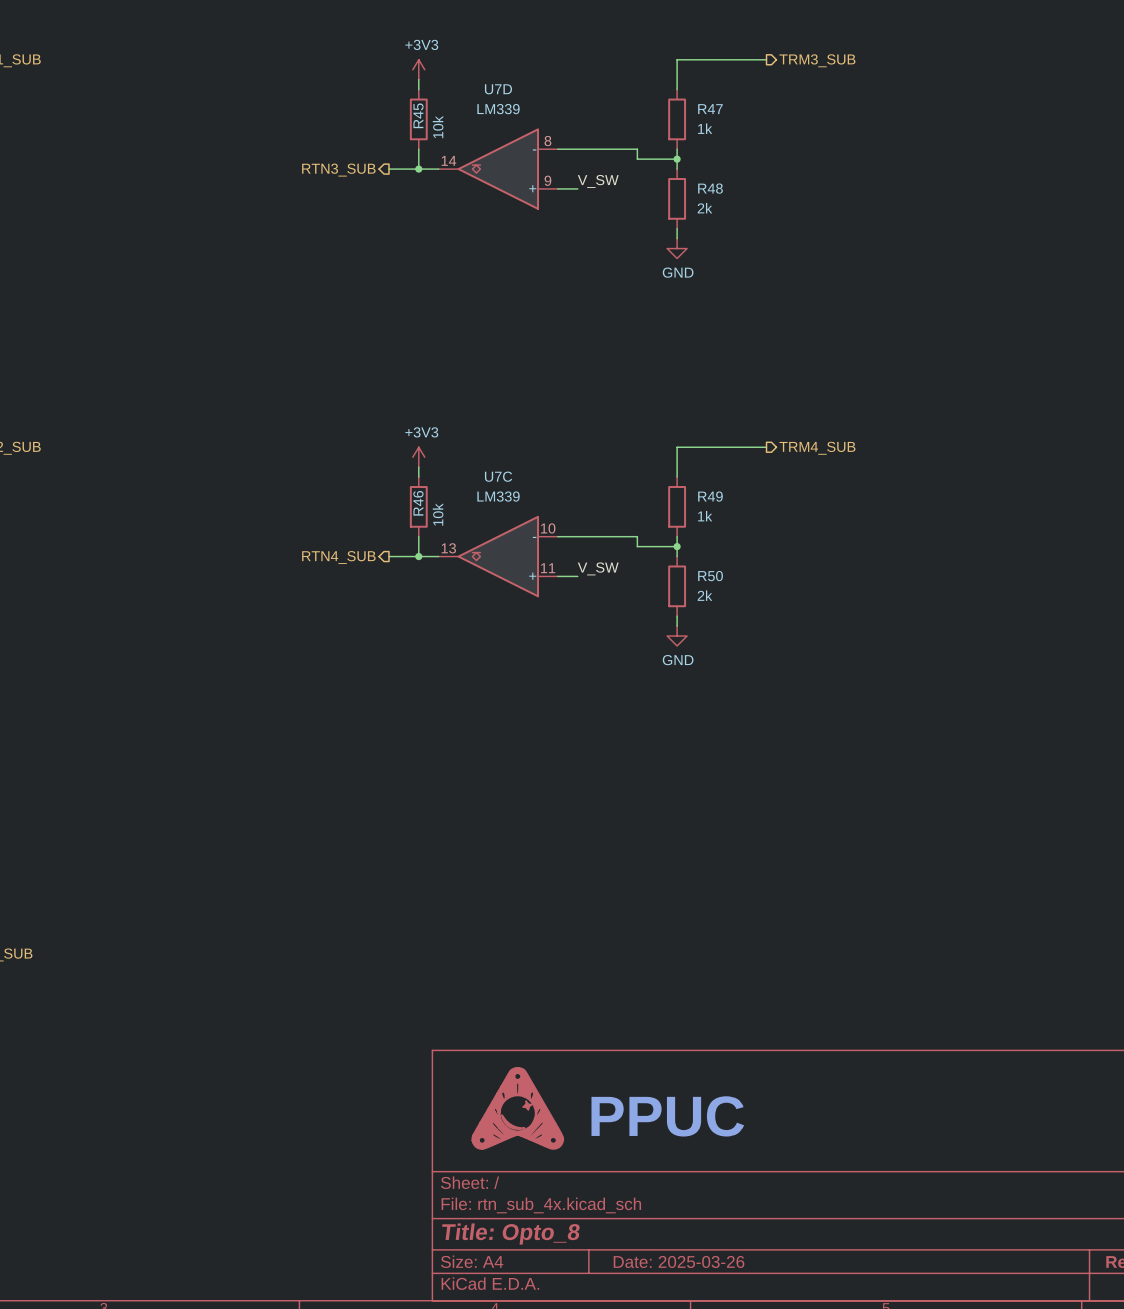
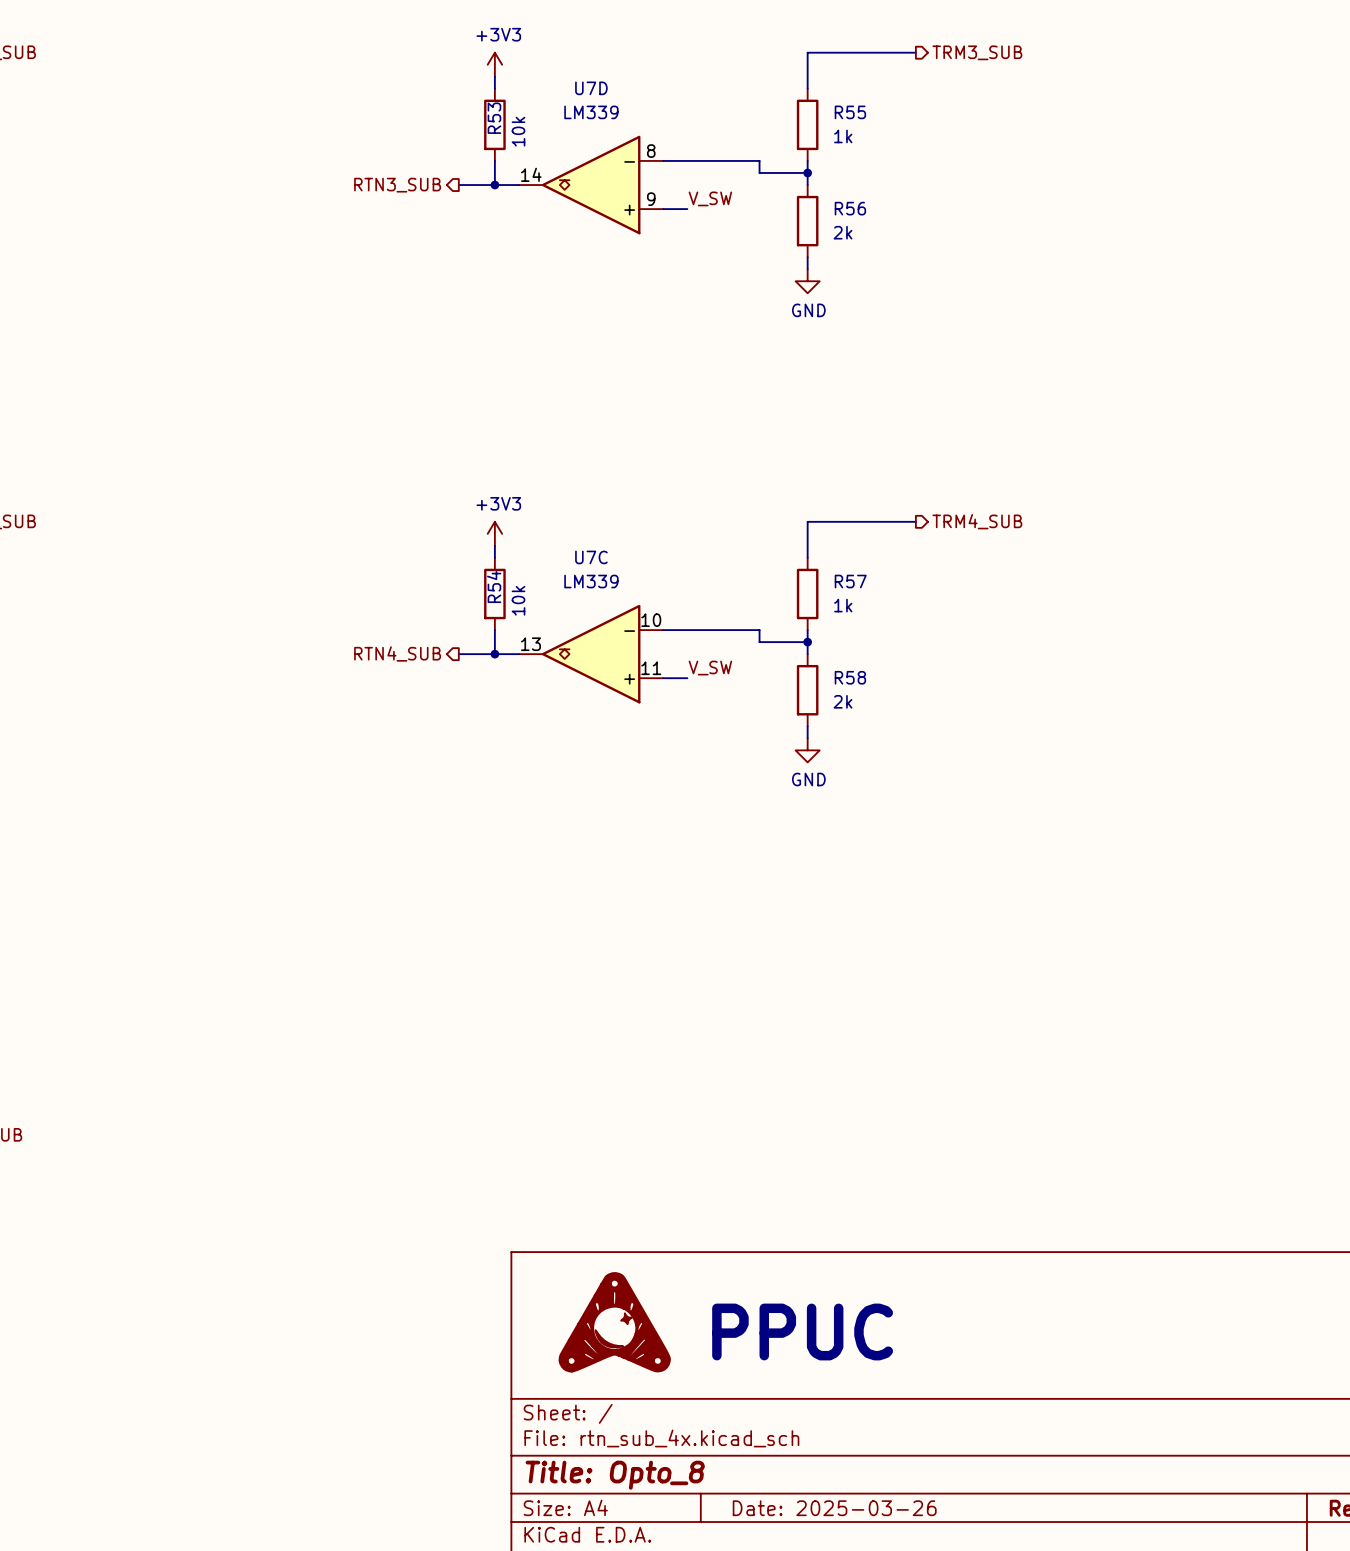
R47 name: R47 (710, 109) -> R55 (850, 112)
R45 name: R45 (418, 115) -> R53 (494, 118)
R48 name: R48 (710, 188) -> R56 (850, 208)
R49 name: R49 (710, 496) -> R57 (850, 581)
R46 name: R46 (418, 503) -> R54 (494, 587)
R50 name: R50 (710, 576) -> R58 (850, 677)

